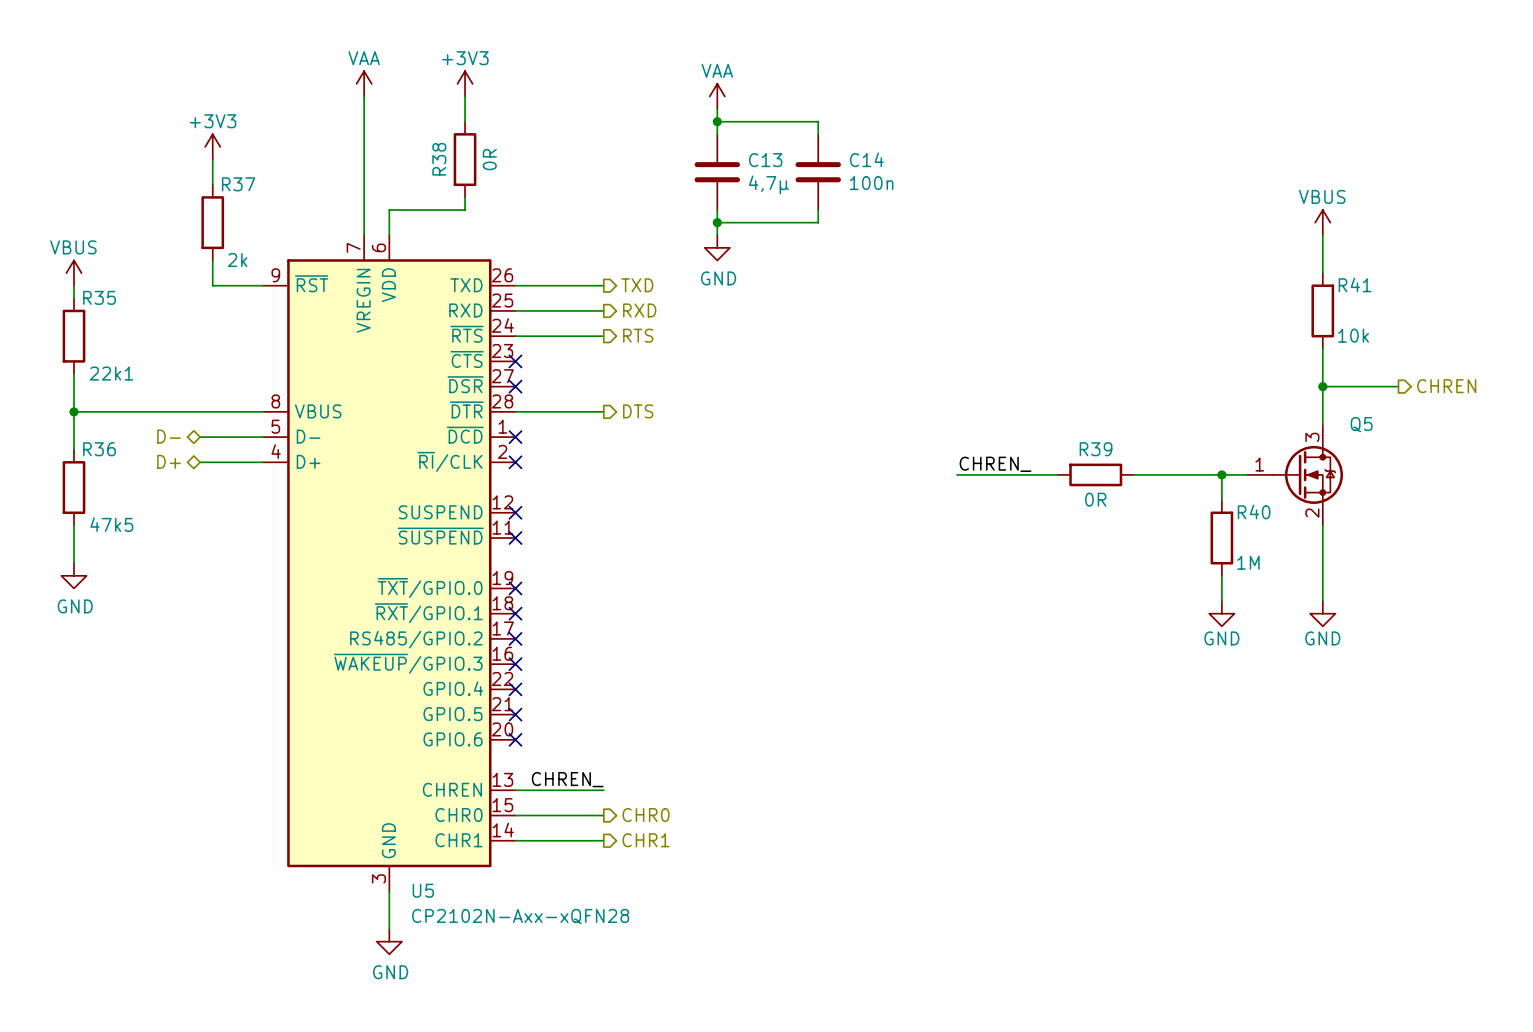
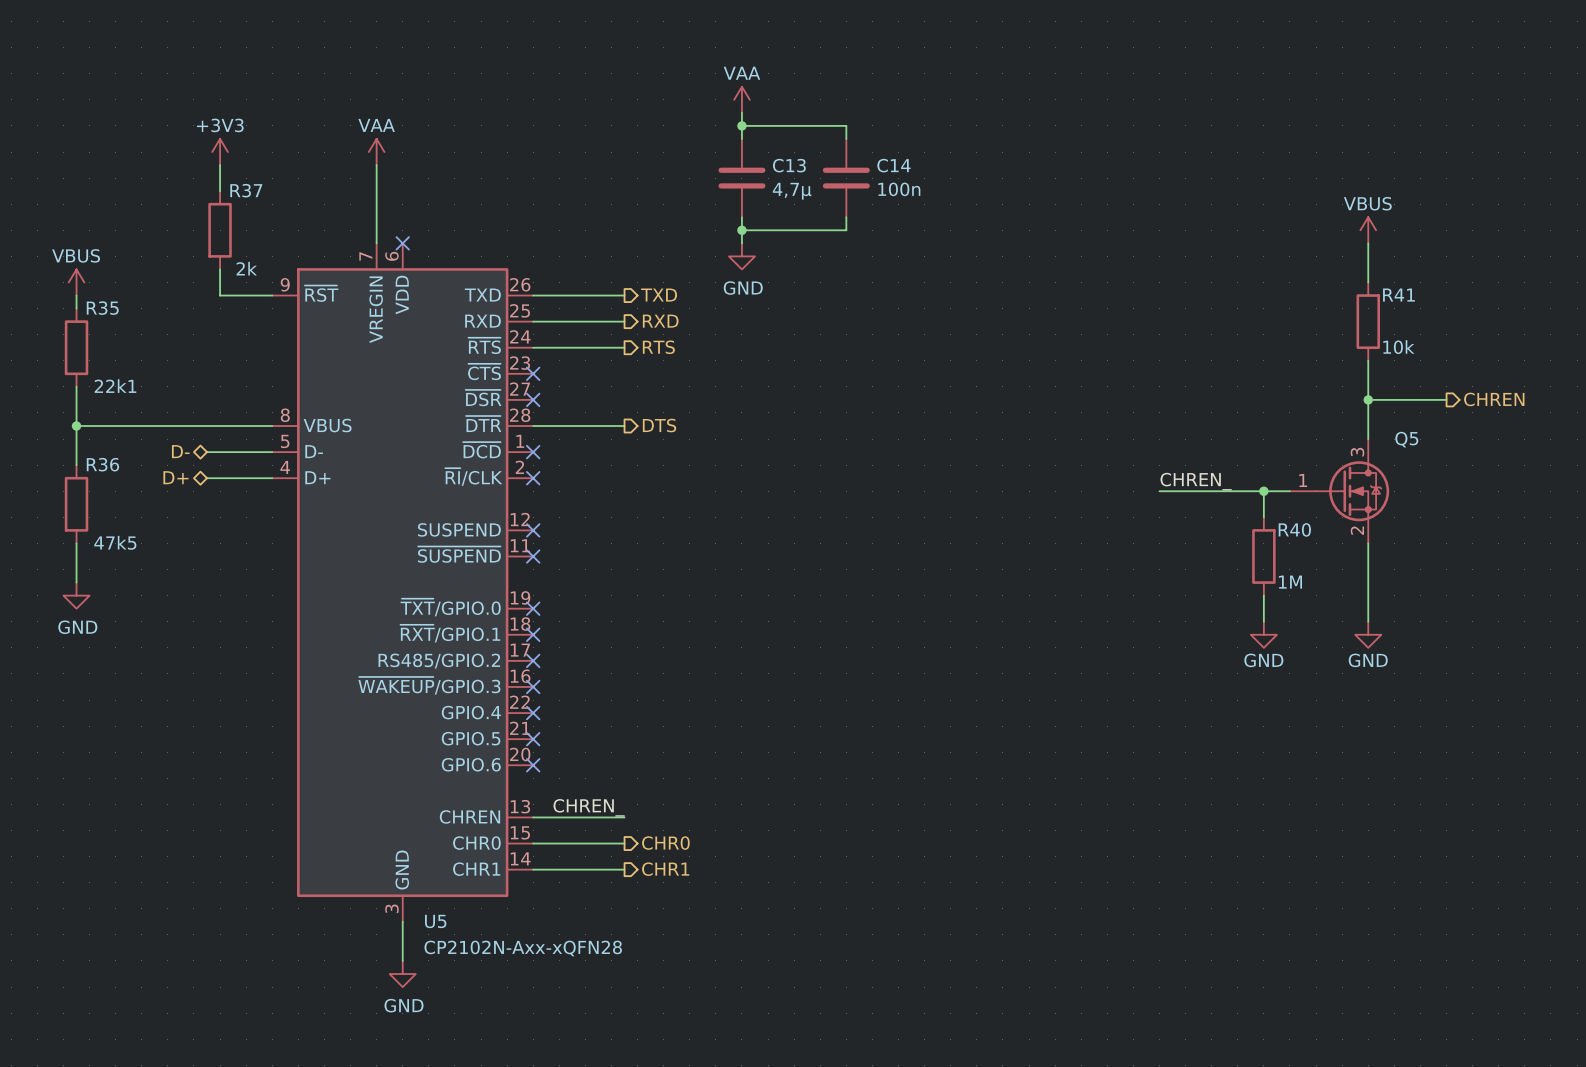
power symbol position: VAA (364, 83) -> VAA (376, 152)
power symbol: +3V3 (465, 83) -> none
wire: (364, 96) (364, 159) -> none
wire: (465, 96) (465, 121) -> none
R38: 0R (465, 159) -> none
wire: (465, 197) (465, 210) (389, 210) (389, 235) -> none
no-connect mark: none -> (402, 243)
label position: CHREN_ (995, 464) -> CHREN_ (1196, 481)
wire: (956, 474) (1057, 474) -> none
R39: 0R (1095, 474) -> none

